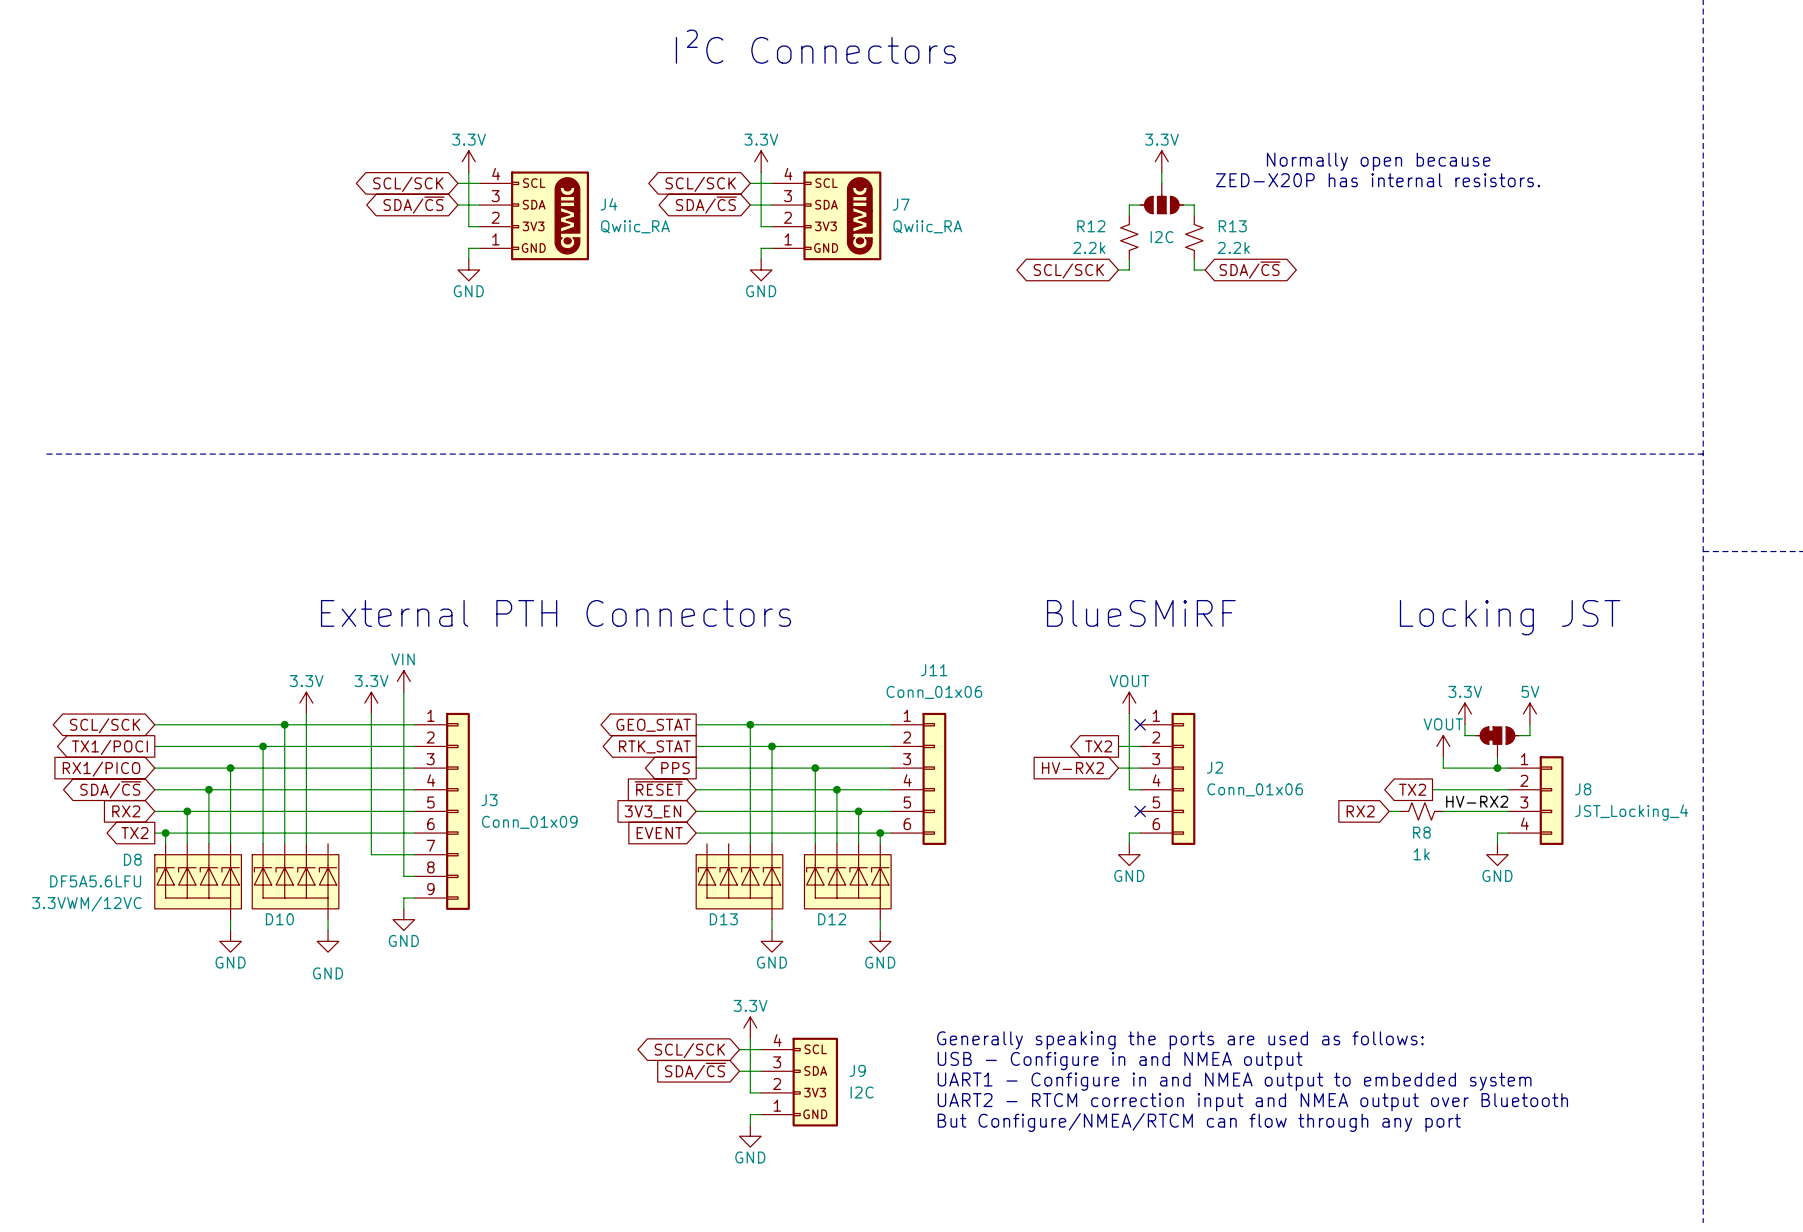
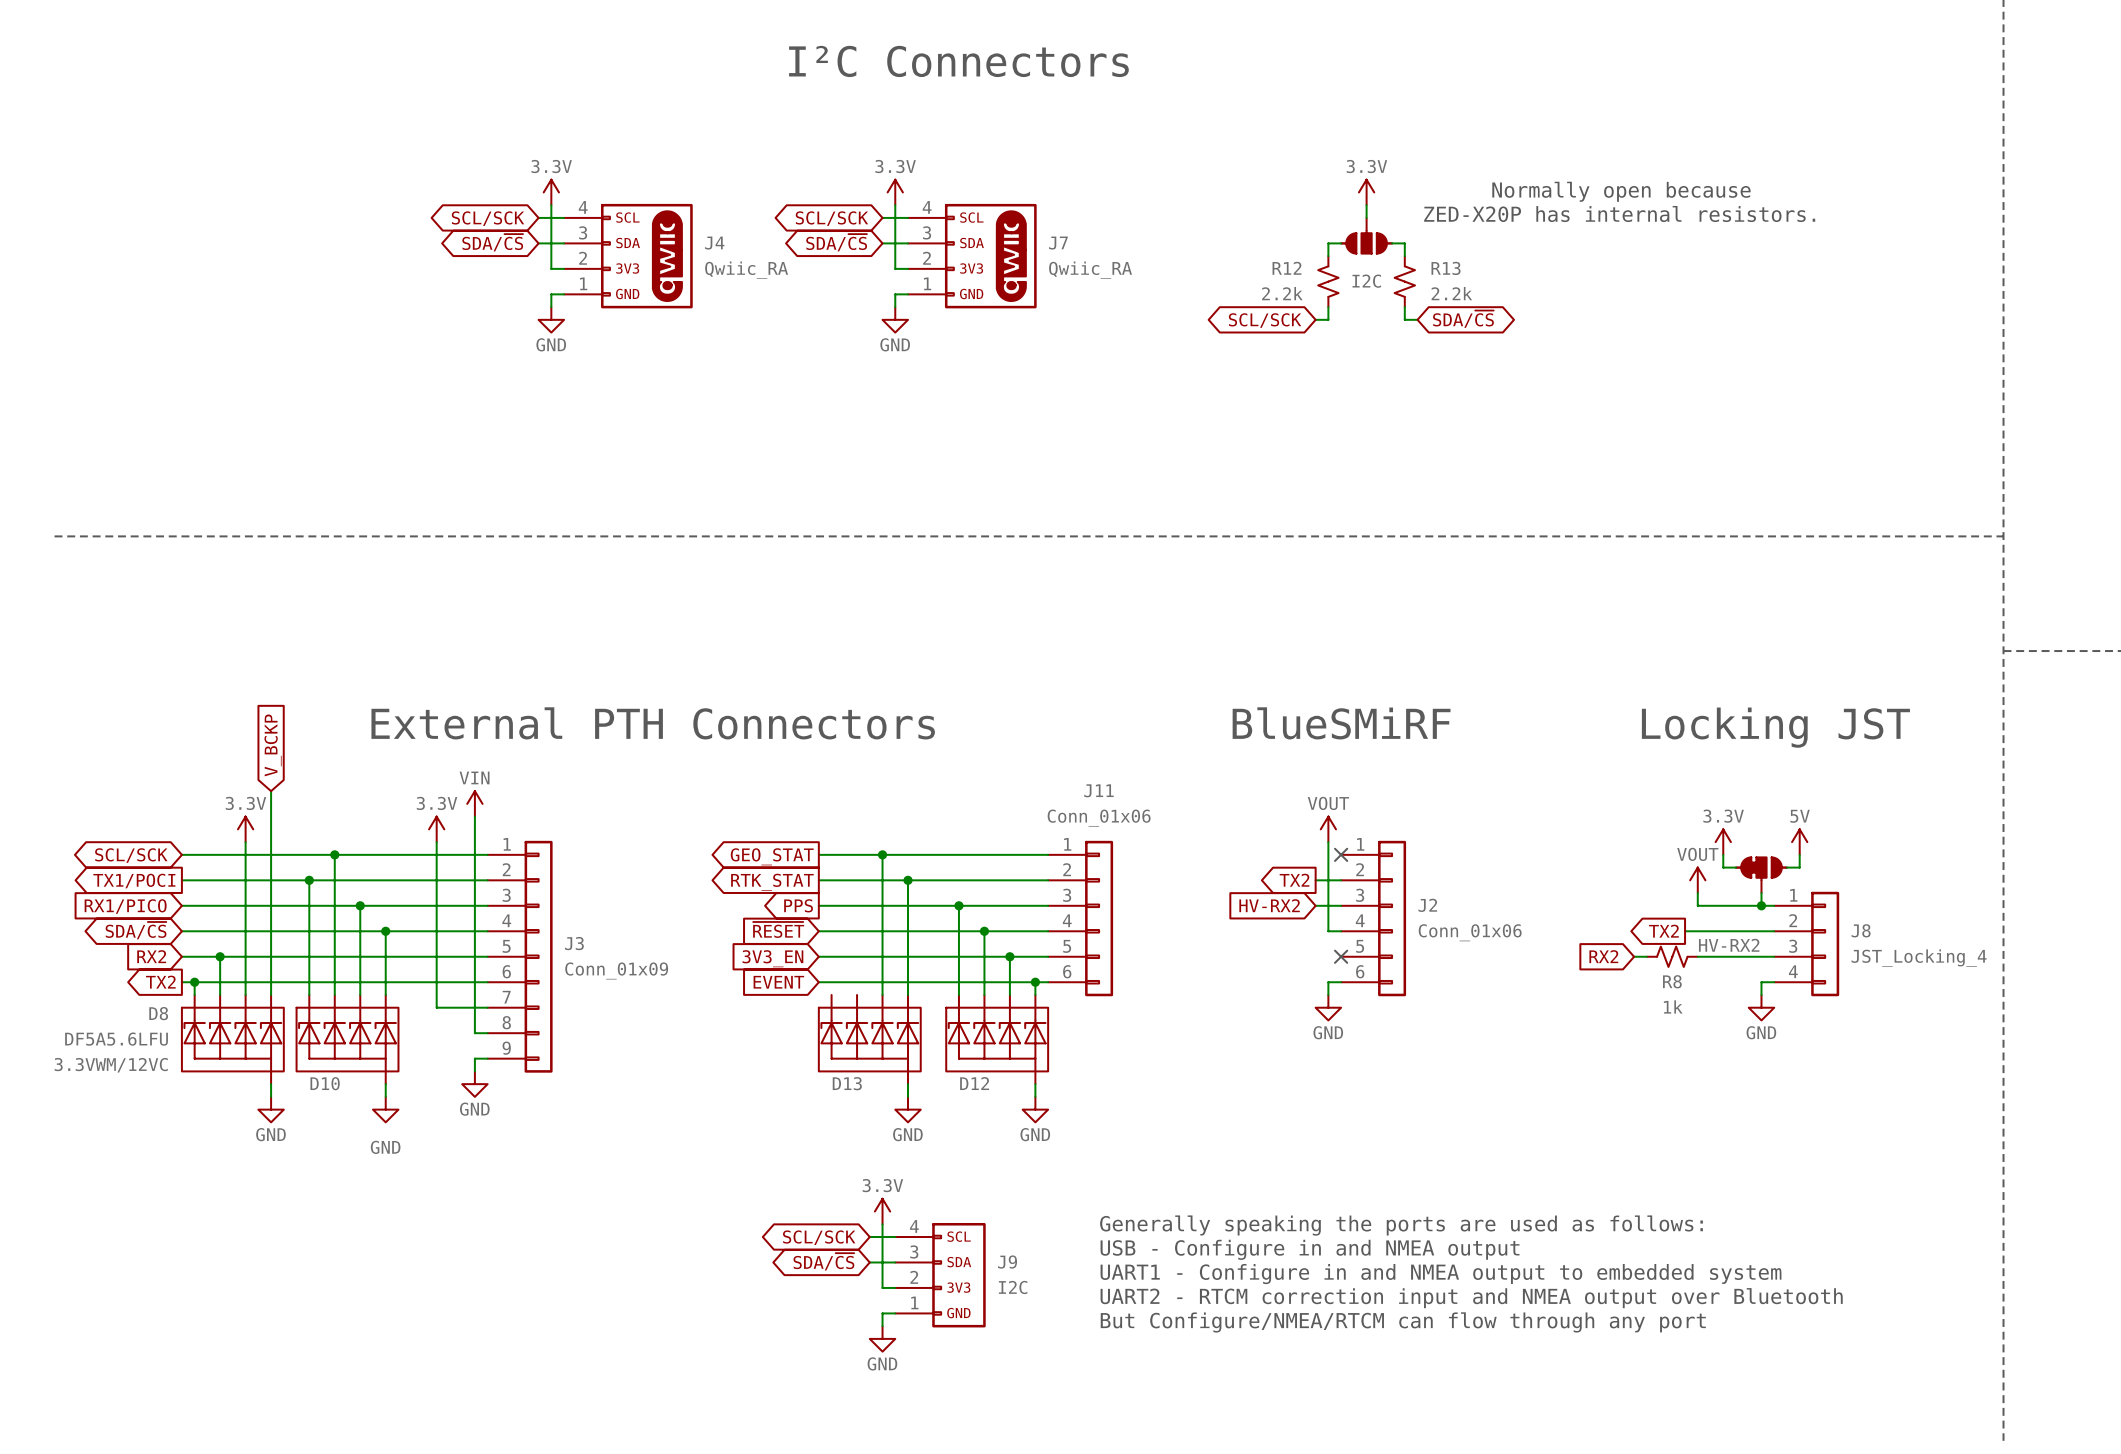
global label: none -> V_BCKP (273, 745)
wire: none -> (271, 791) (271, 905)
power symbol position: 3.3V (306, 703) -> 3.3V (245, 829)
wire: none -> (245, 842) (245, 931)
wire: (306, 713) (306, 768) -> (385, 931) (385, 994)
junction: (230, 768) -> none
junction: none -> (360, 905)
junction: (208, 789) -> none
junction: none -> (385, 931)
global label shape: input (695, 1071) -> bidirectional (823, 1261)

